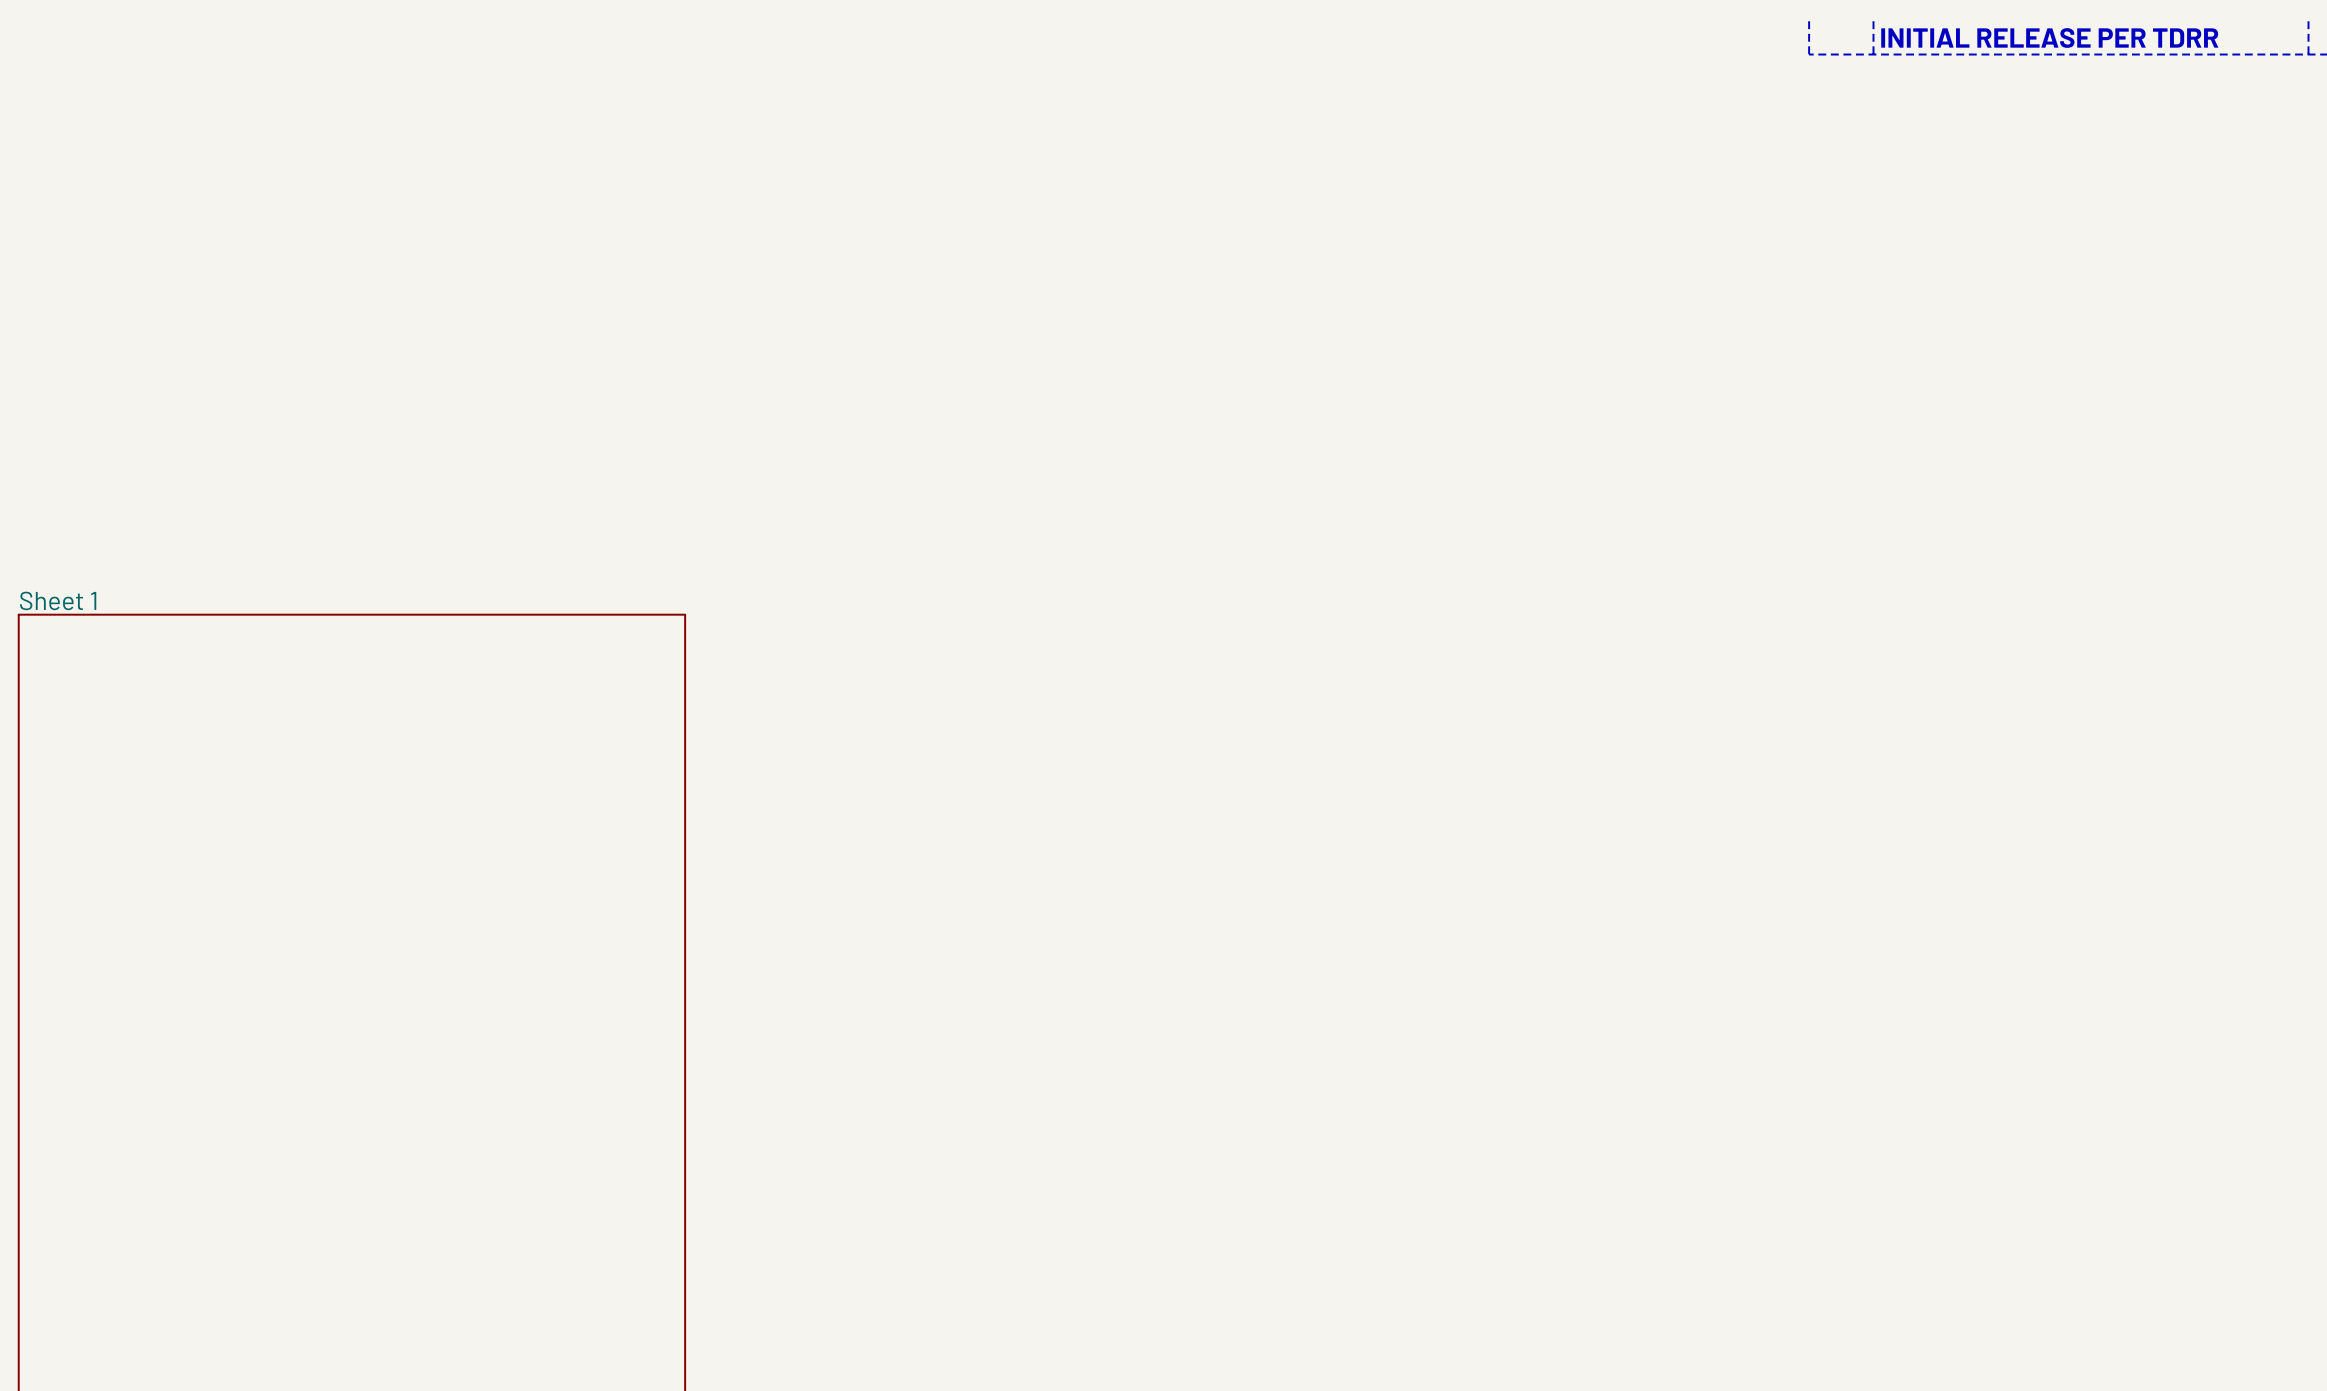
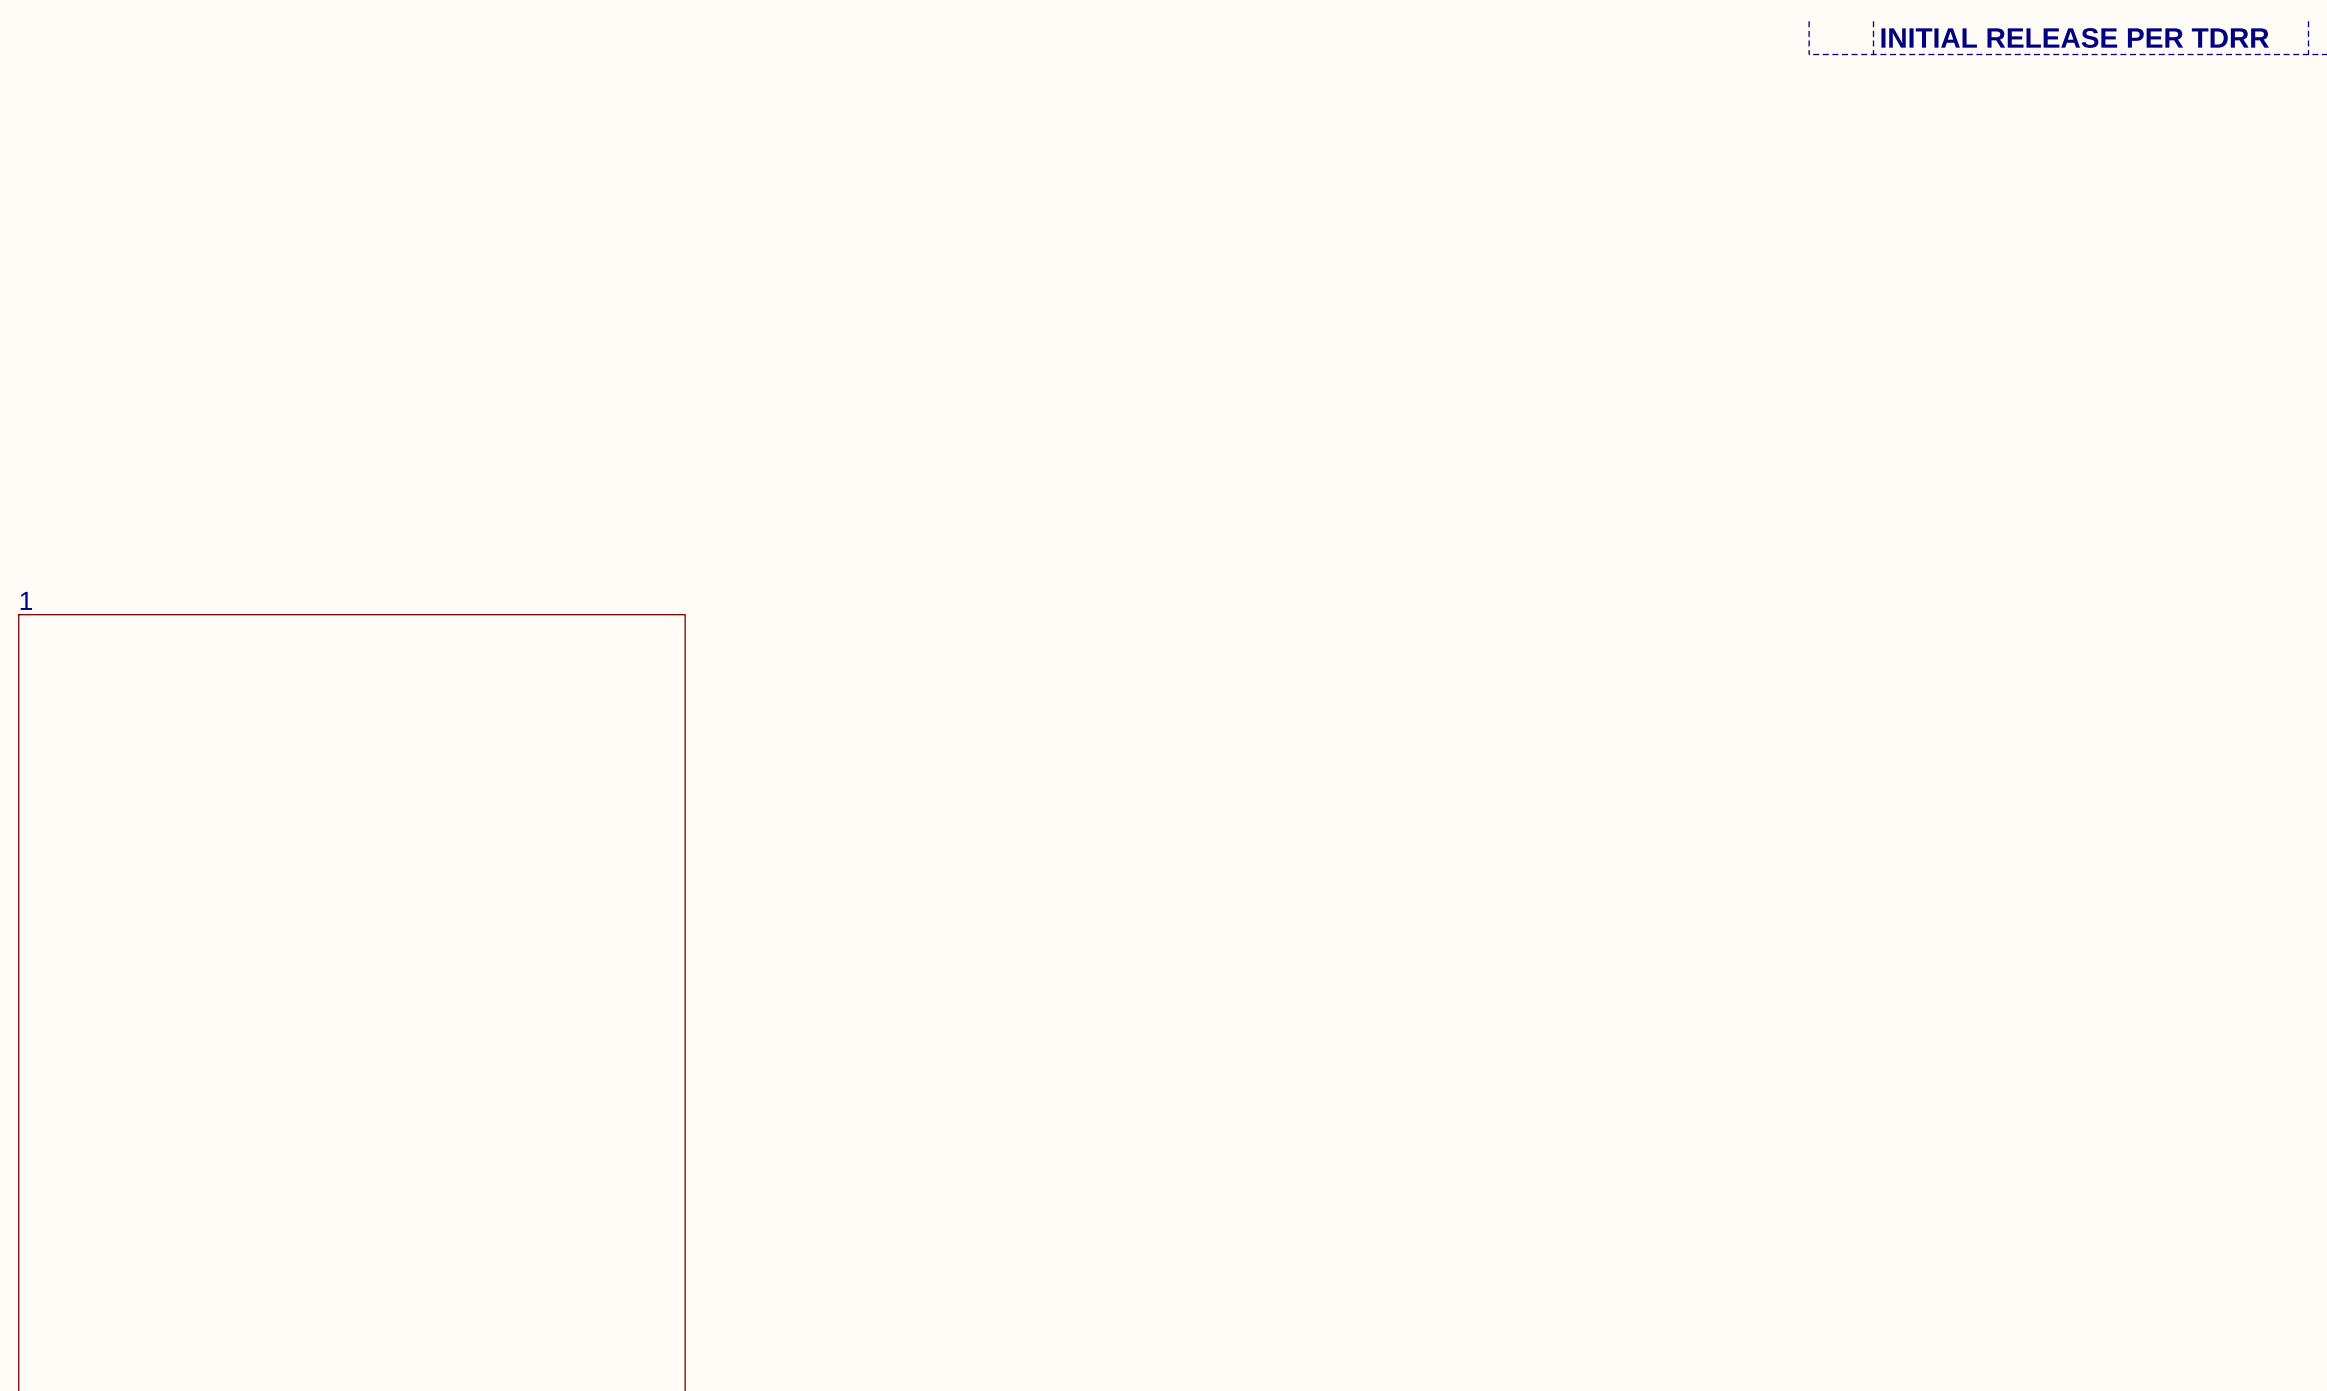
sheet Sheet 1 name: Sheet 1 (58, 600) -> 1 (26, 600)

